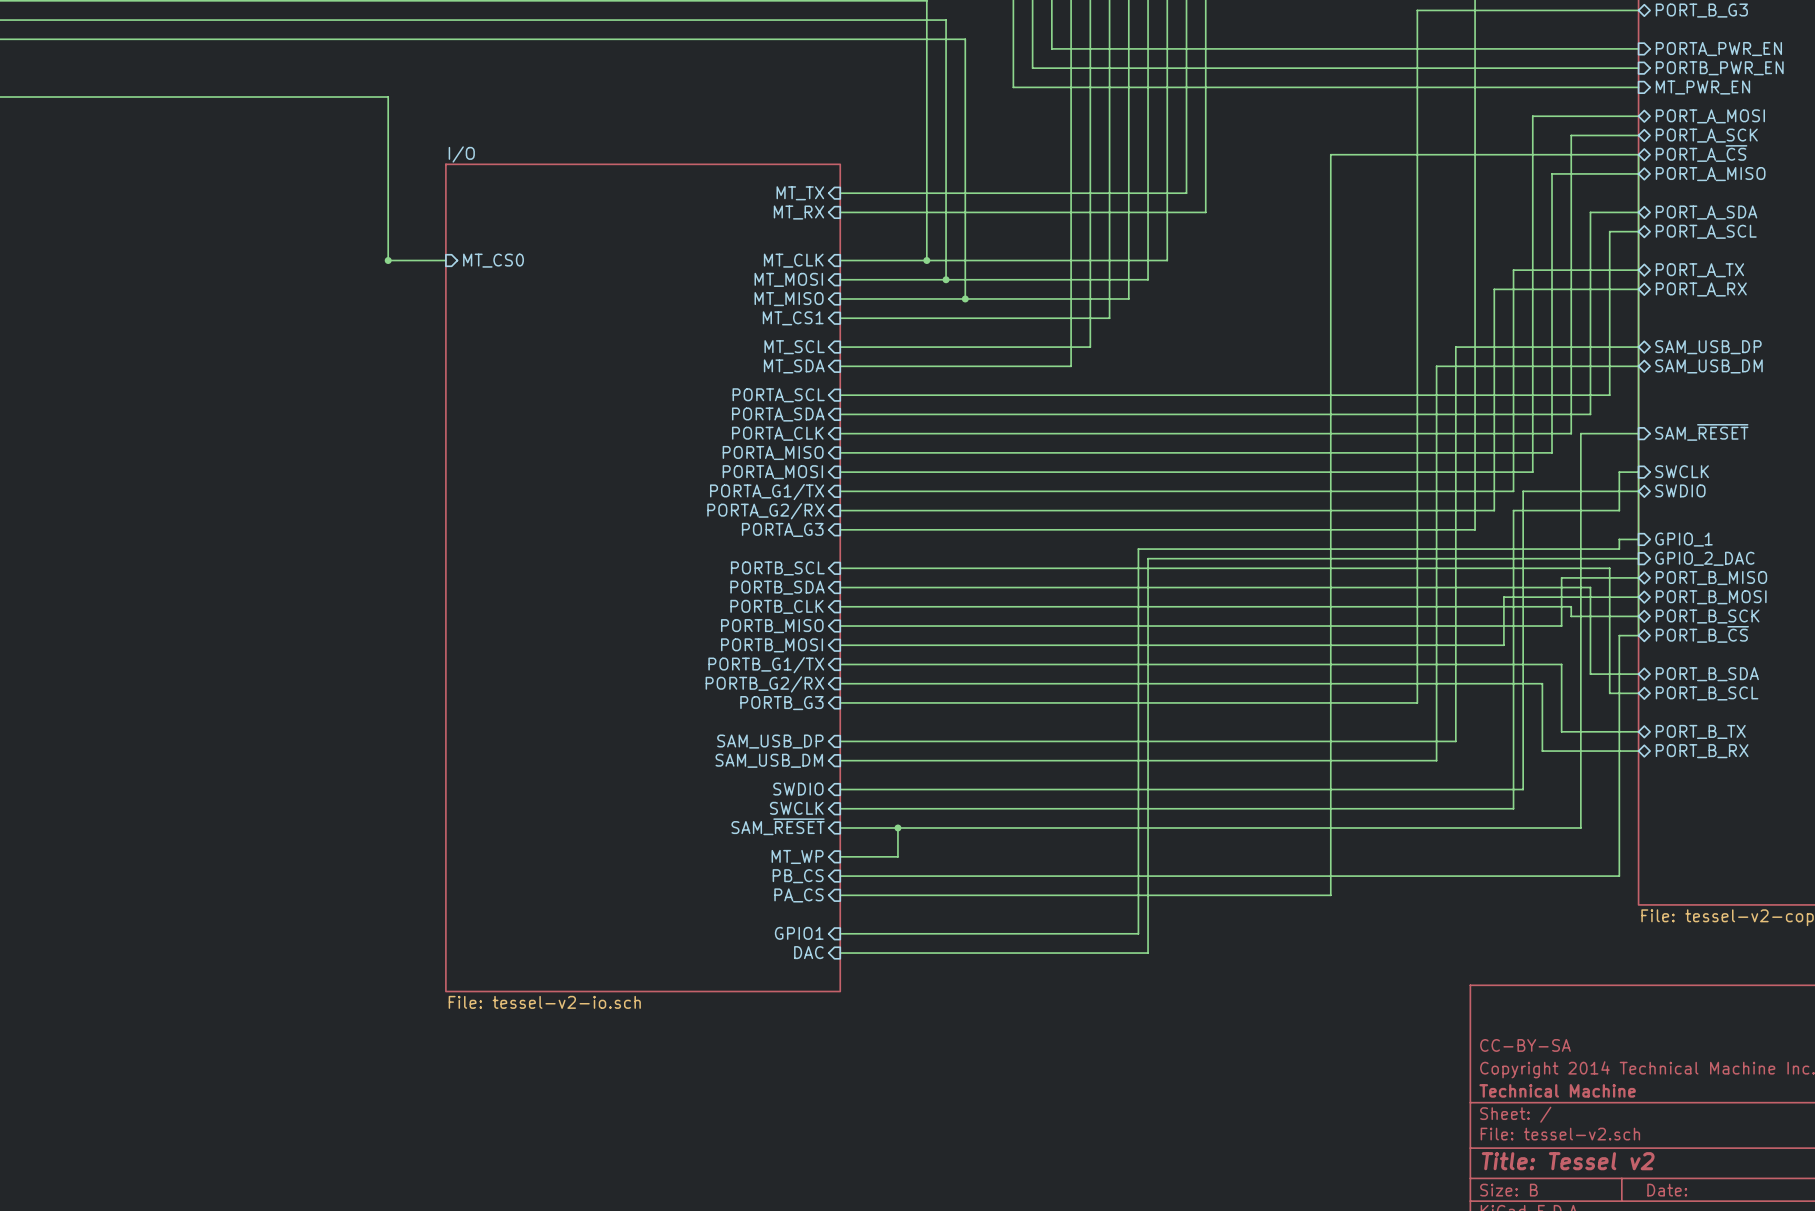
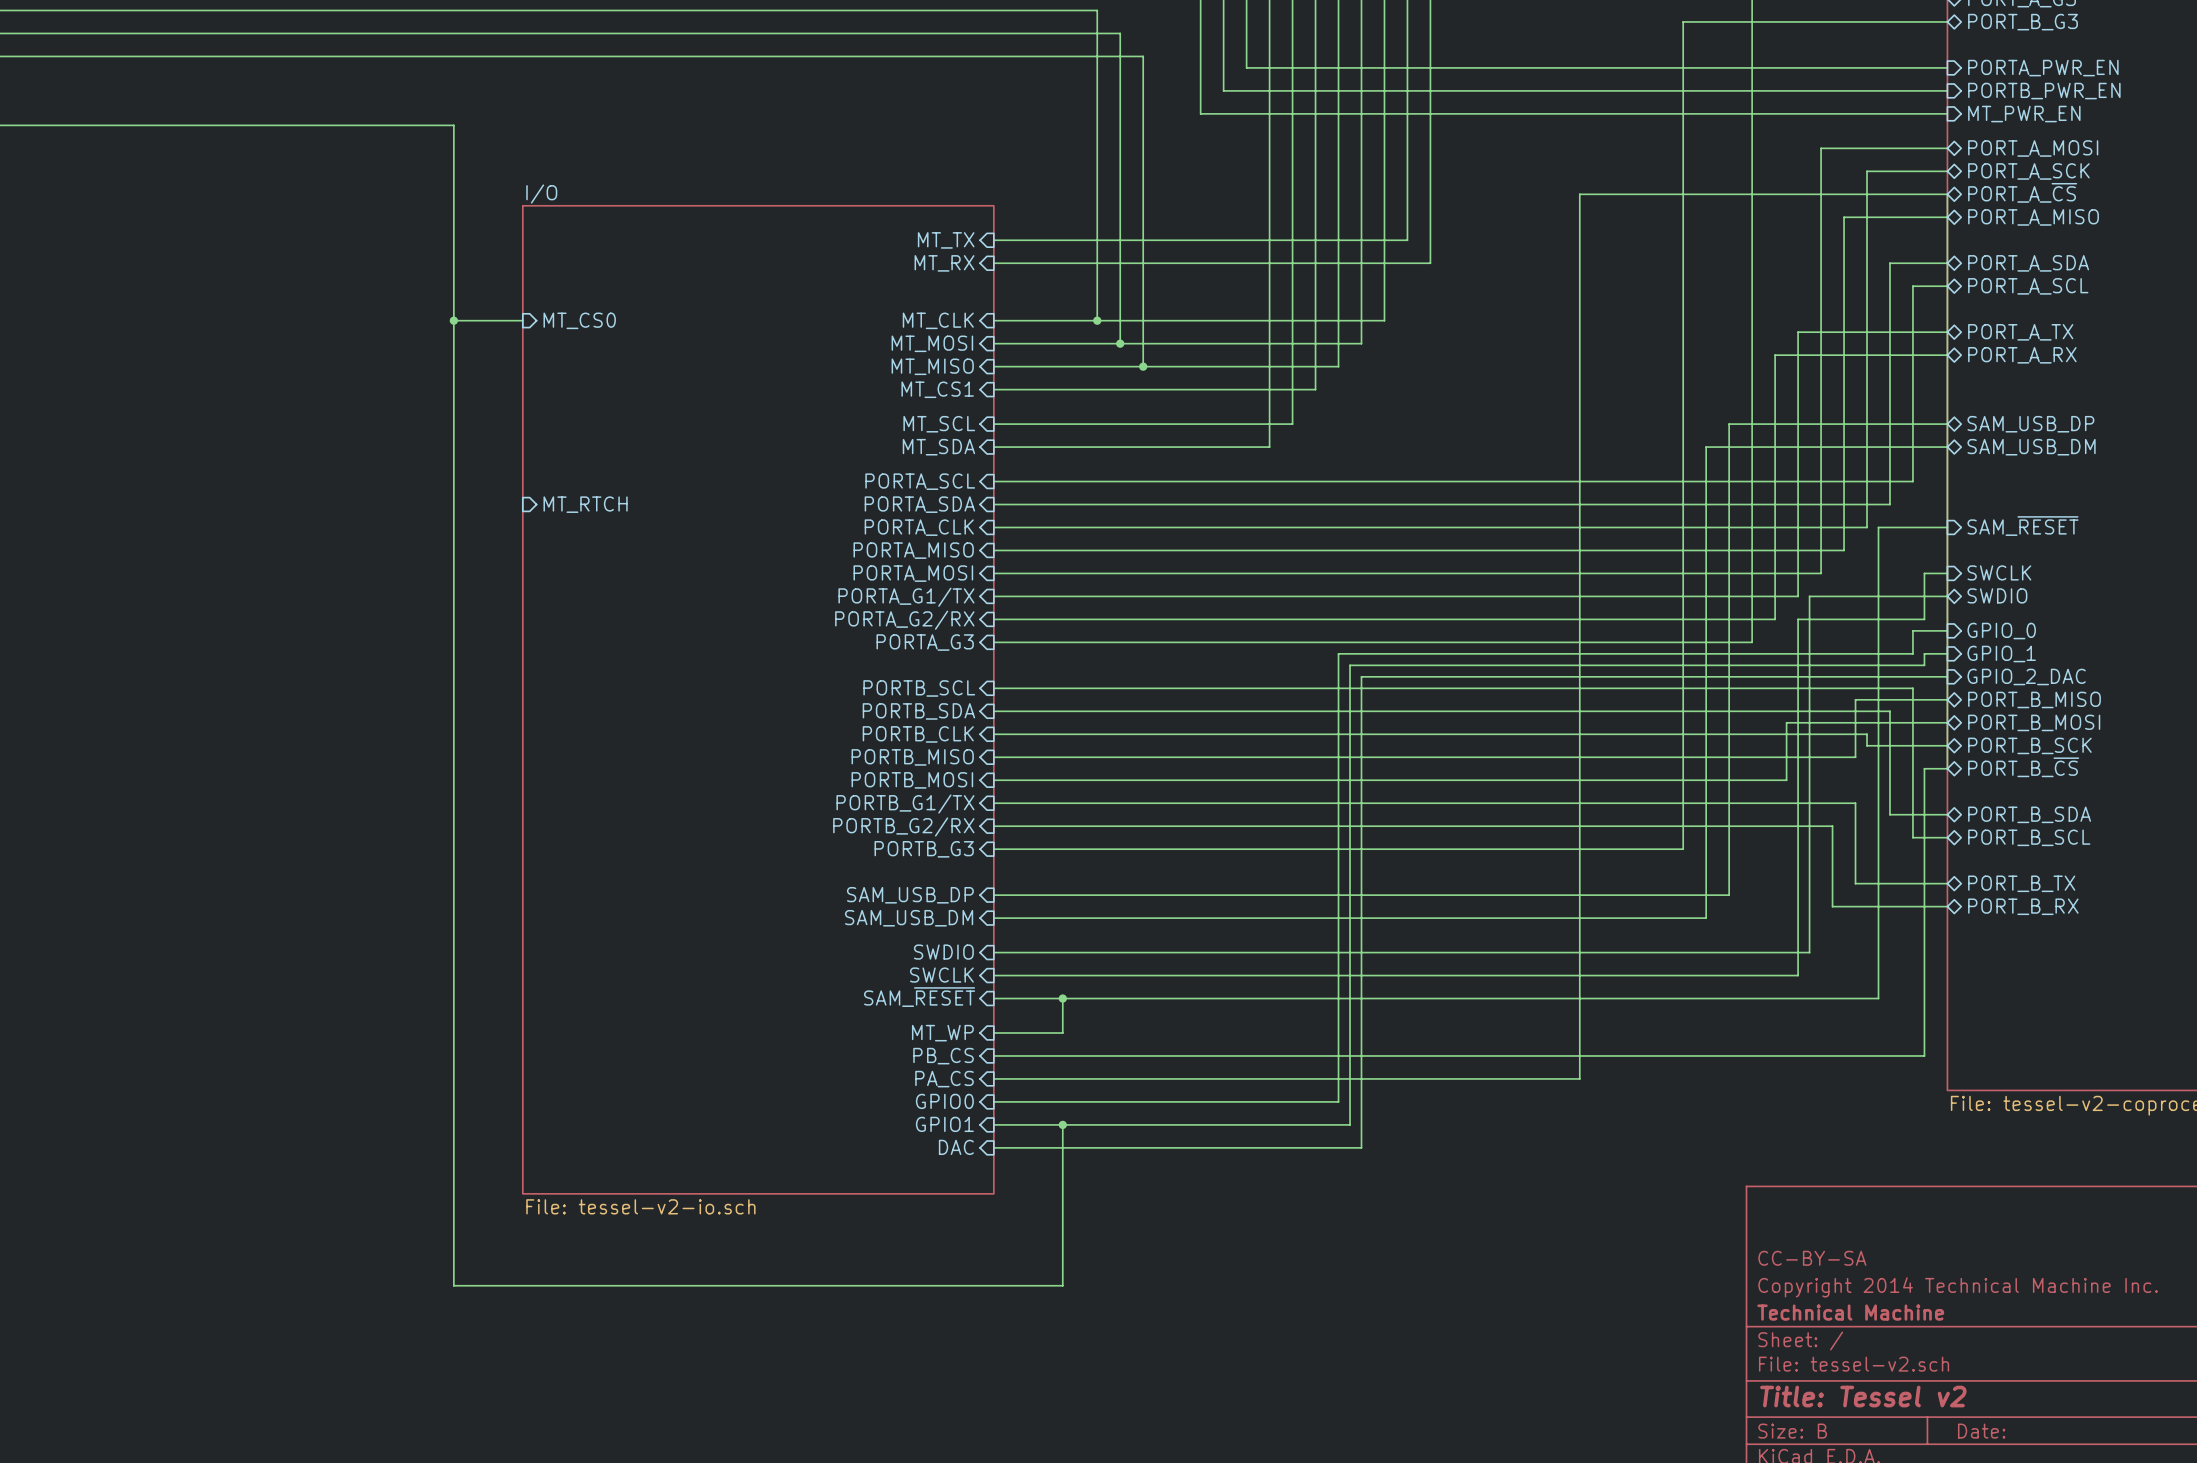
wire: none -> (453, 320) (453, 1285) (1062, 1285) (1062, 1124)
sheet pin: none -> MT_RTCH (585, 504)
wire: none -> (1947, 630) (1912, 630) (1912, 653) (1338, 653) (1338, 1101) (993, 1101)
sheet pin: none -> GPIO_0 (2001, 631)
sheet pin: none -> GPIO0 (944, 1101)
junction: none -> (1062, 1124)

